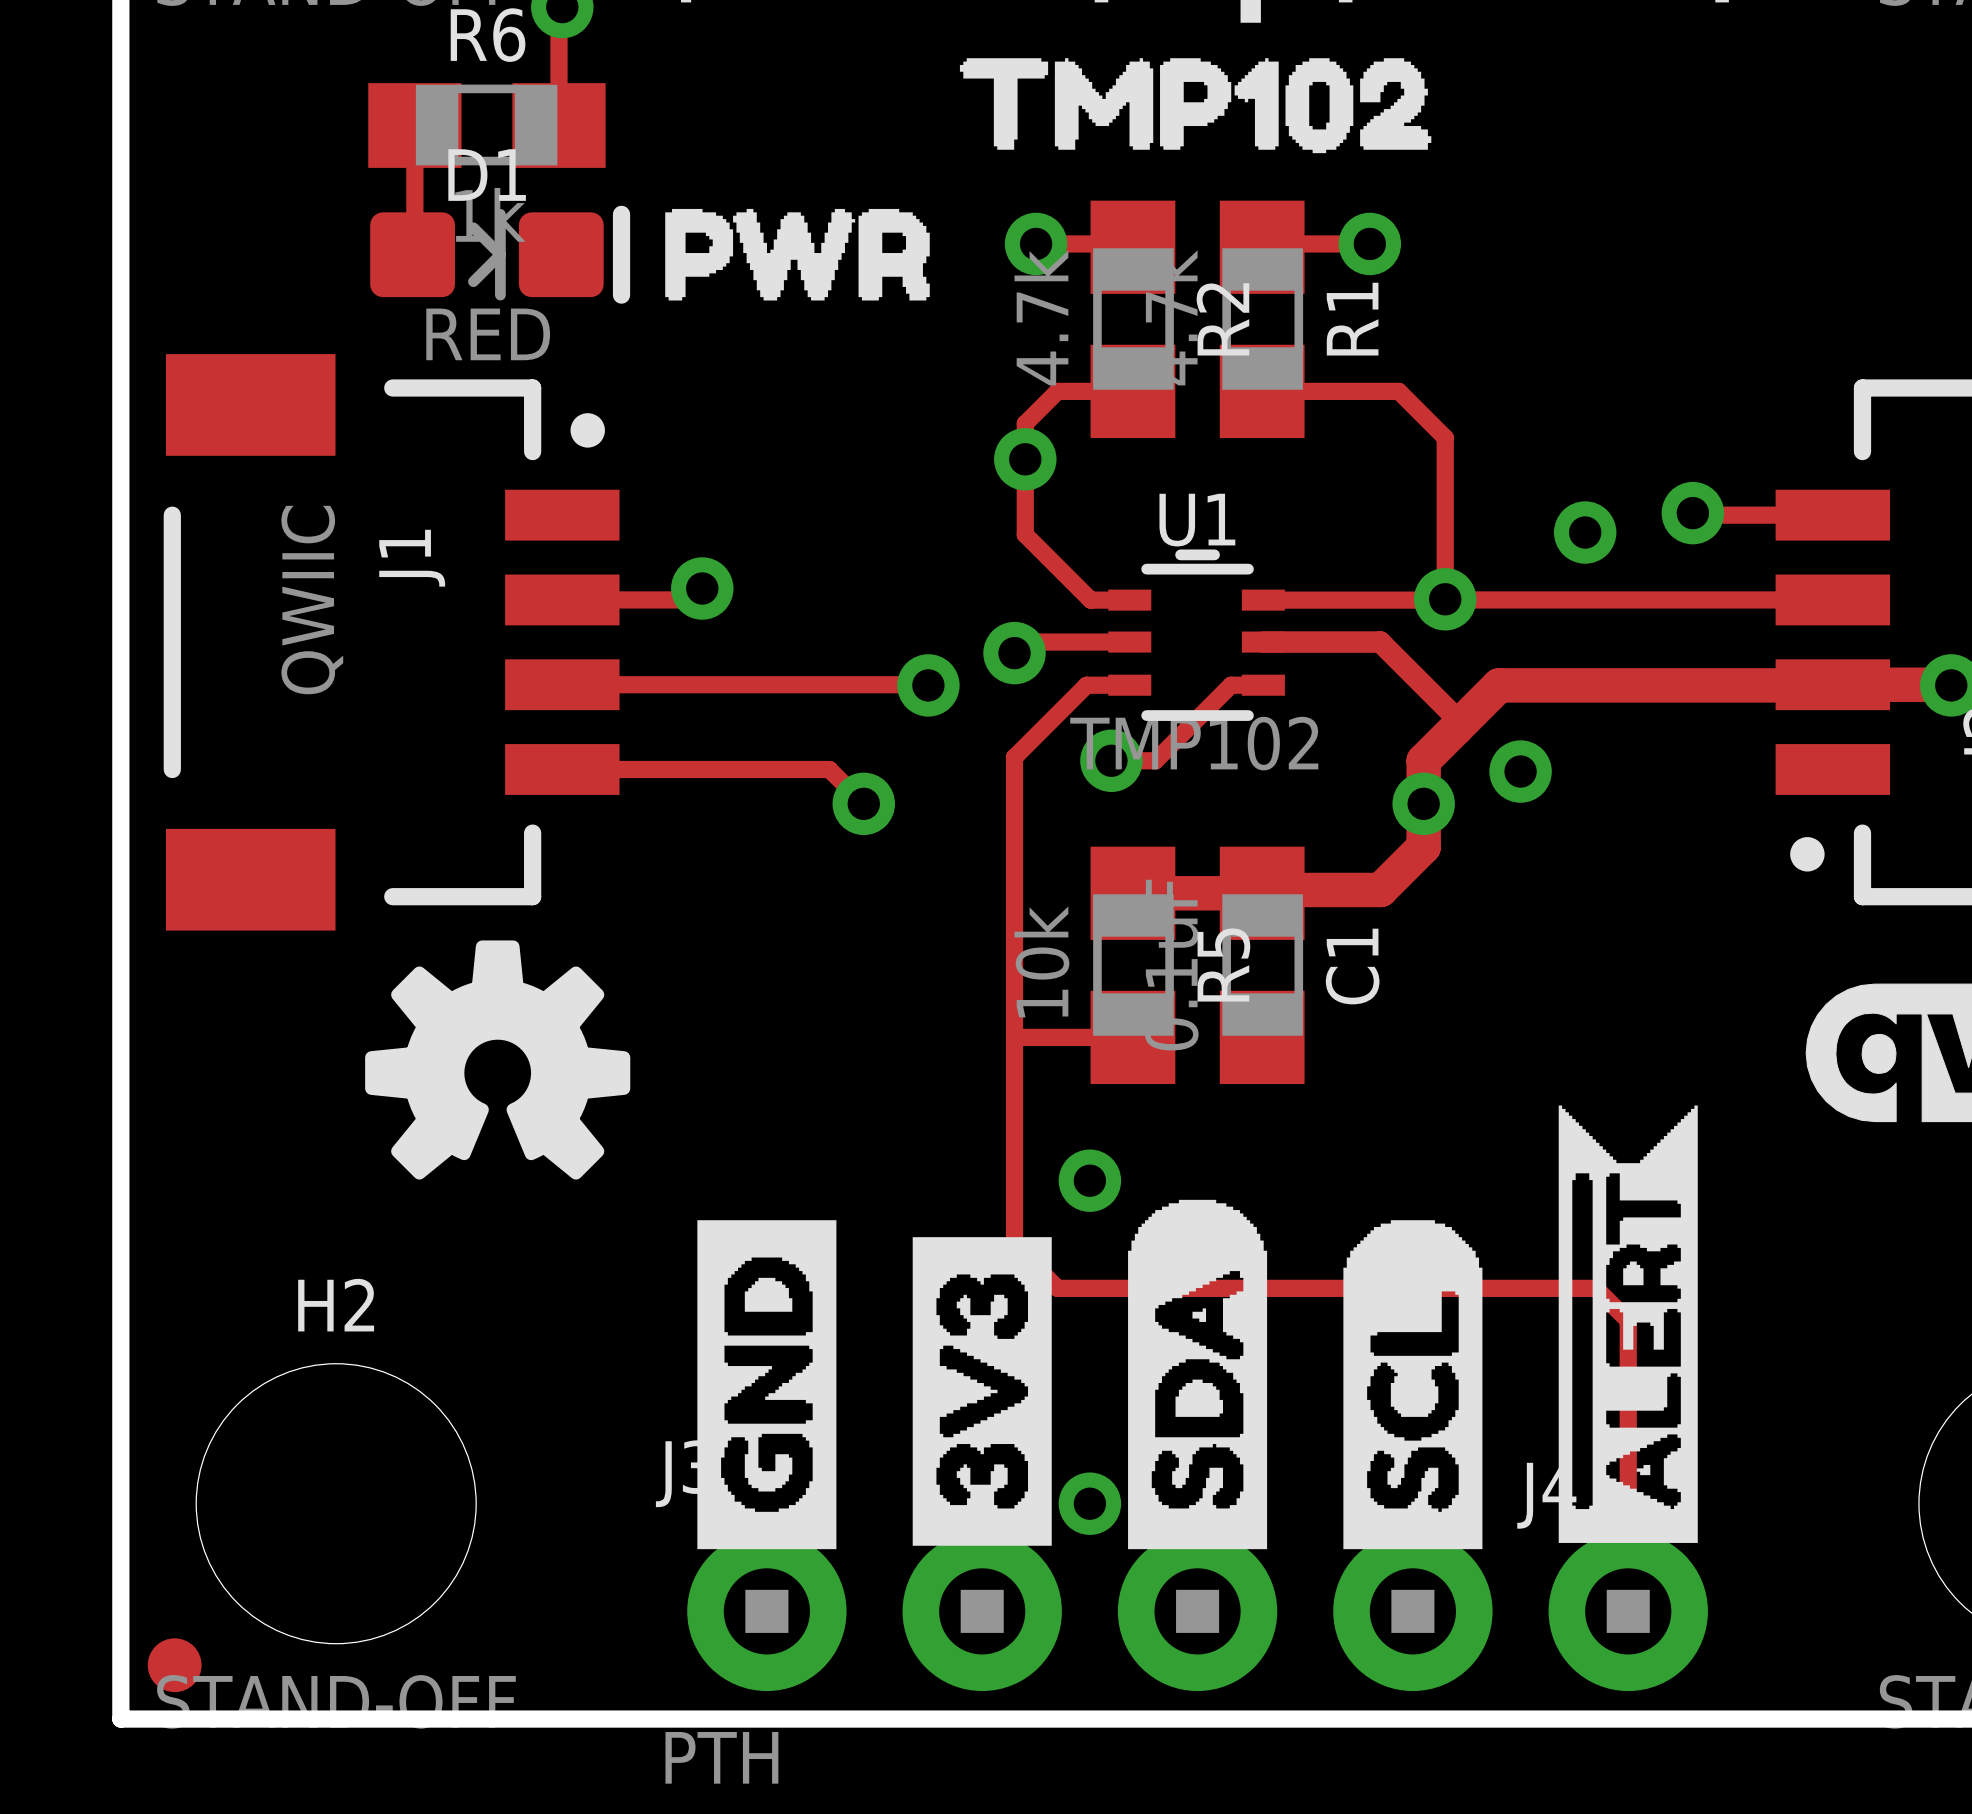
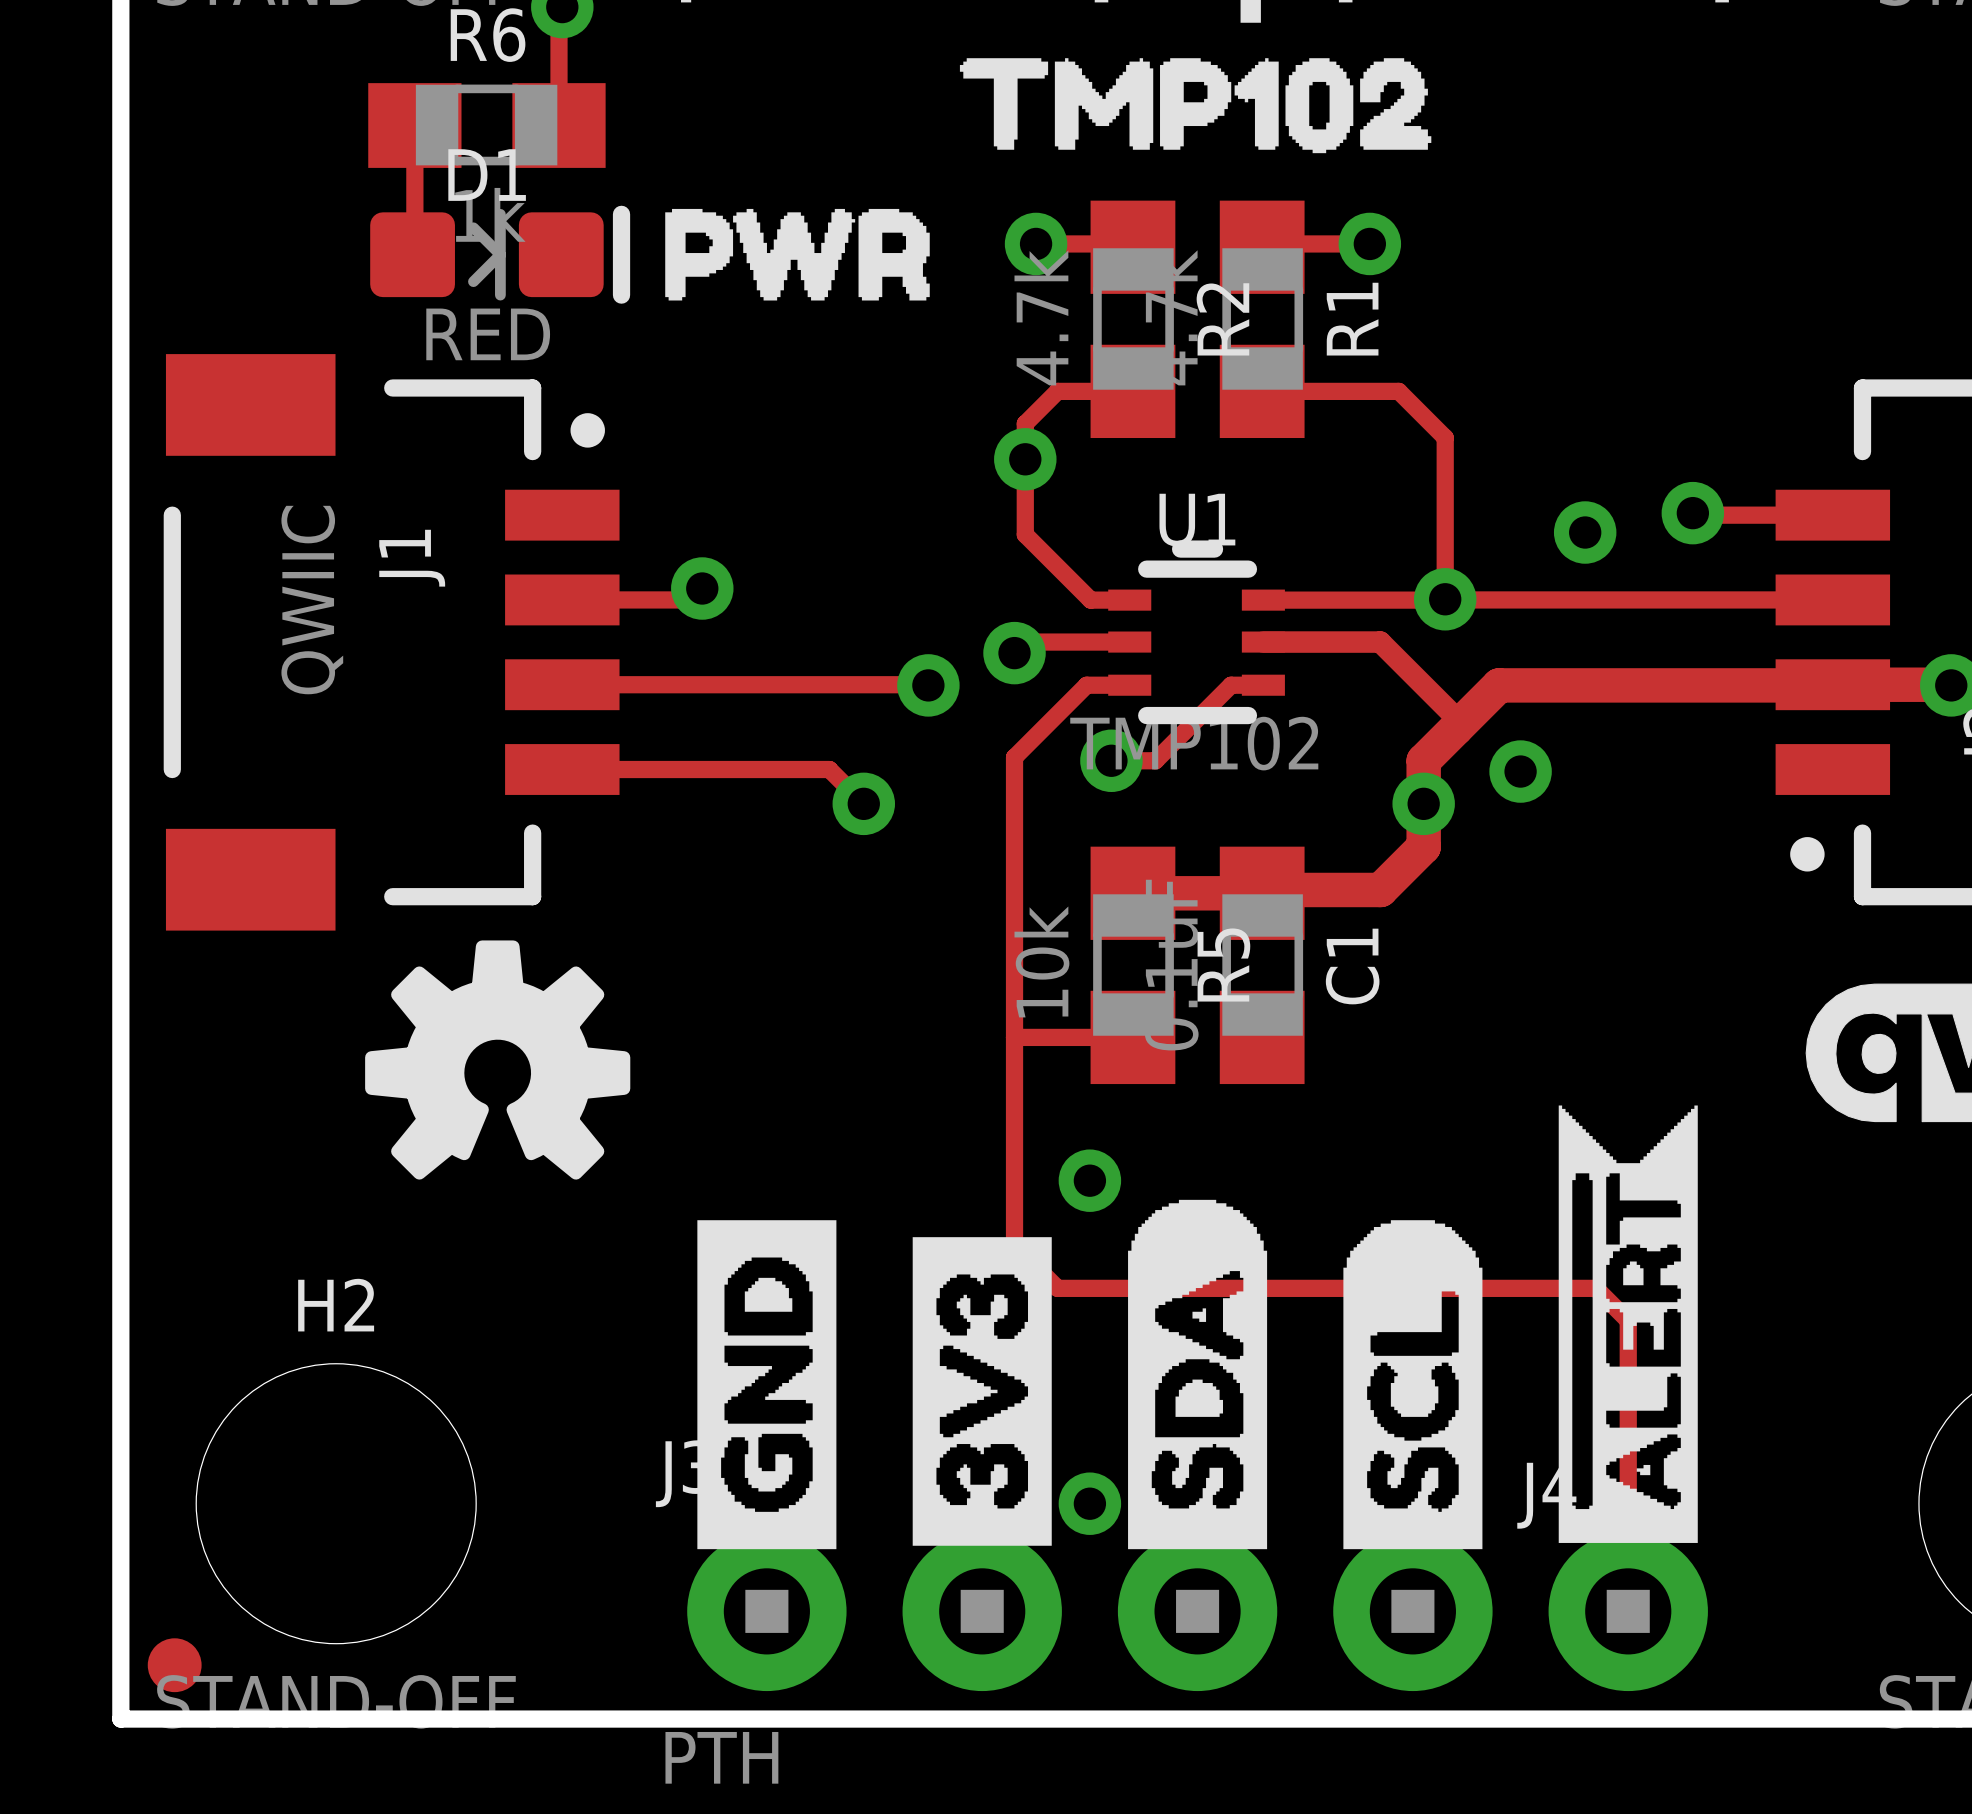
U1 footprint: [1108, 549, 1285, 721] -> [1108, 540, 1285, 725]

